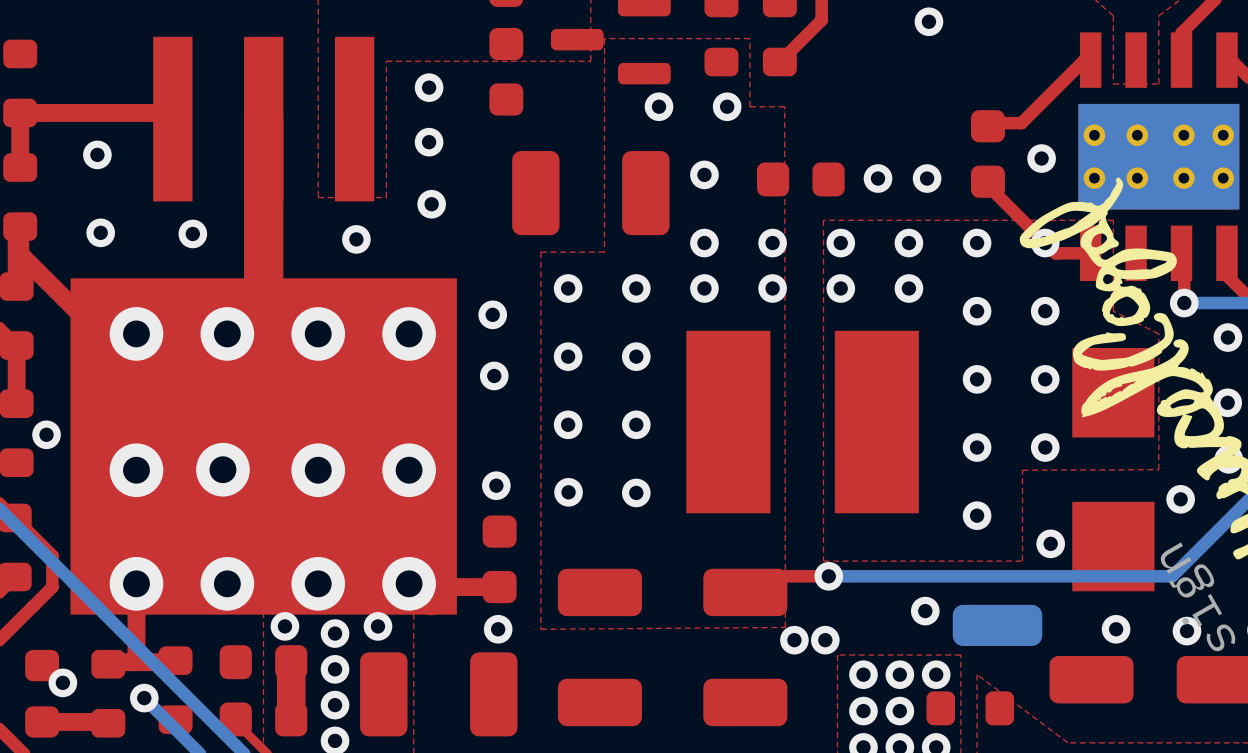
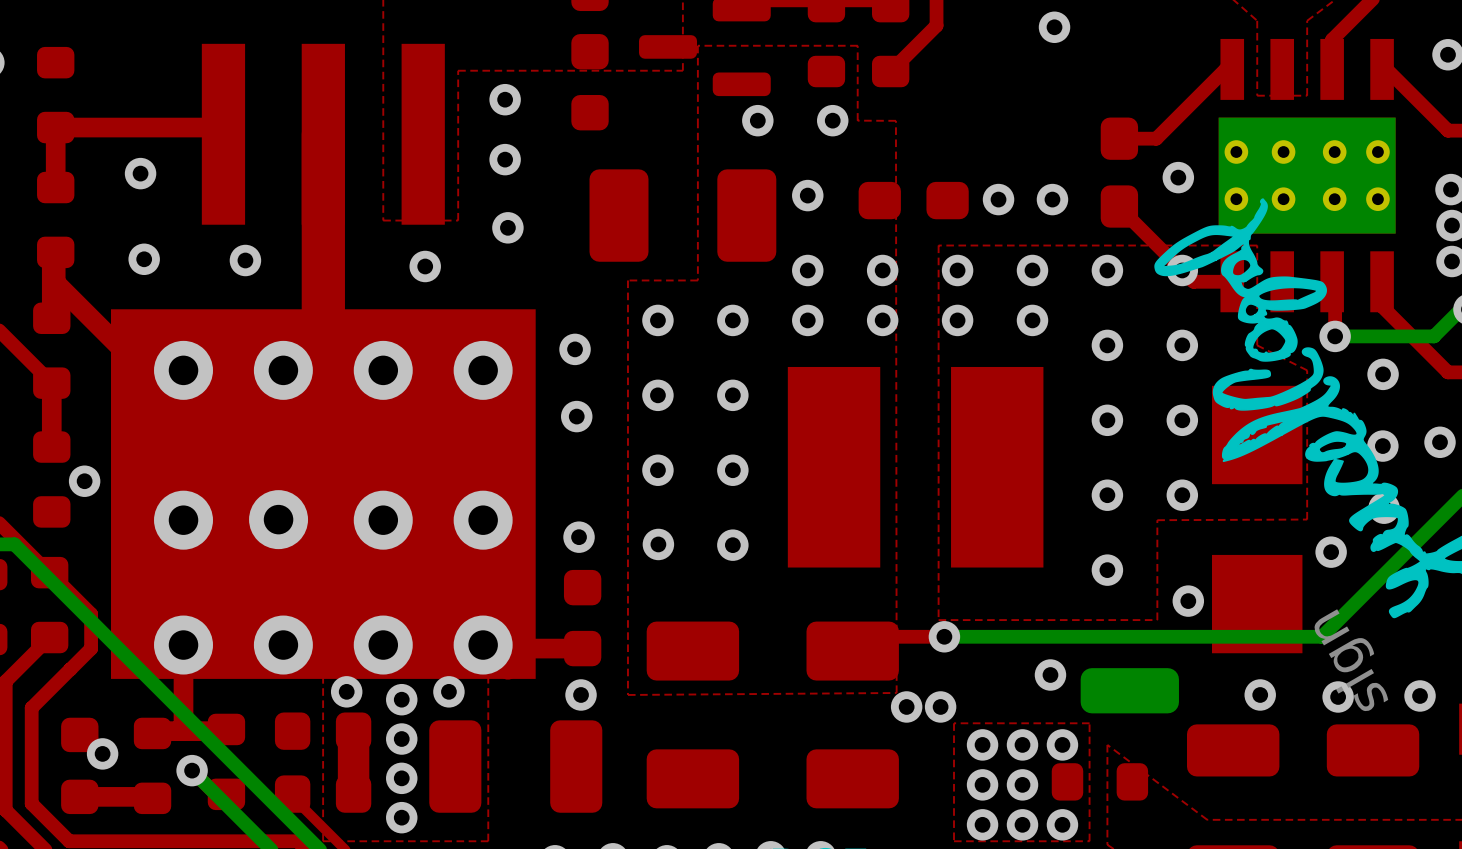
part footprint: [970, 110, 1005, 198] -> [1100, 117, 1139, 228]
part footprint: [512, 151, 670, 236] -> [589, 169, 777, 262]
part footprint: [756, 162, 845, 197] -> [858, 181, 969, 220]
part footprint: [557, 568, 642, 727] -> [646, 621, 740, 809]
part footprint: [703, 568, 788, 727] -> [806, 621, 899, 809]

